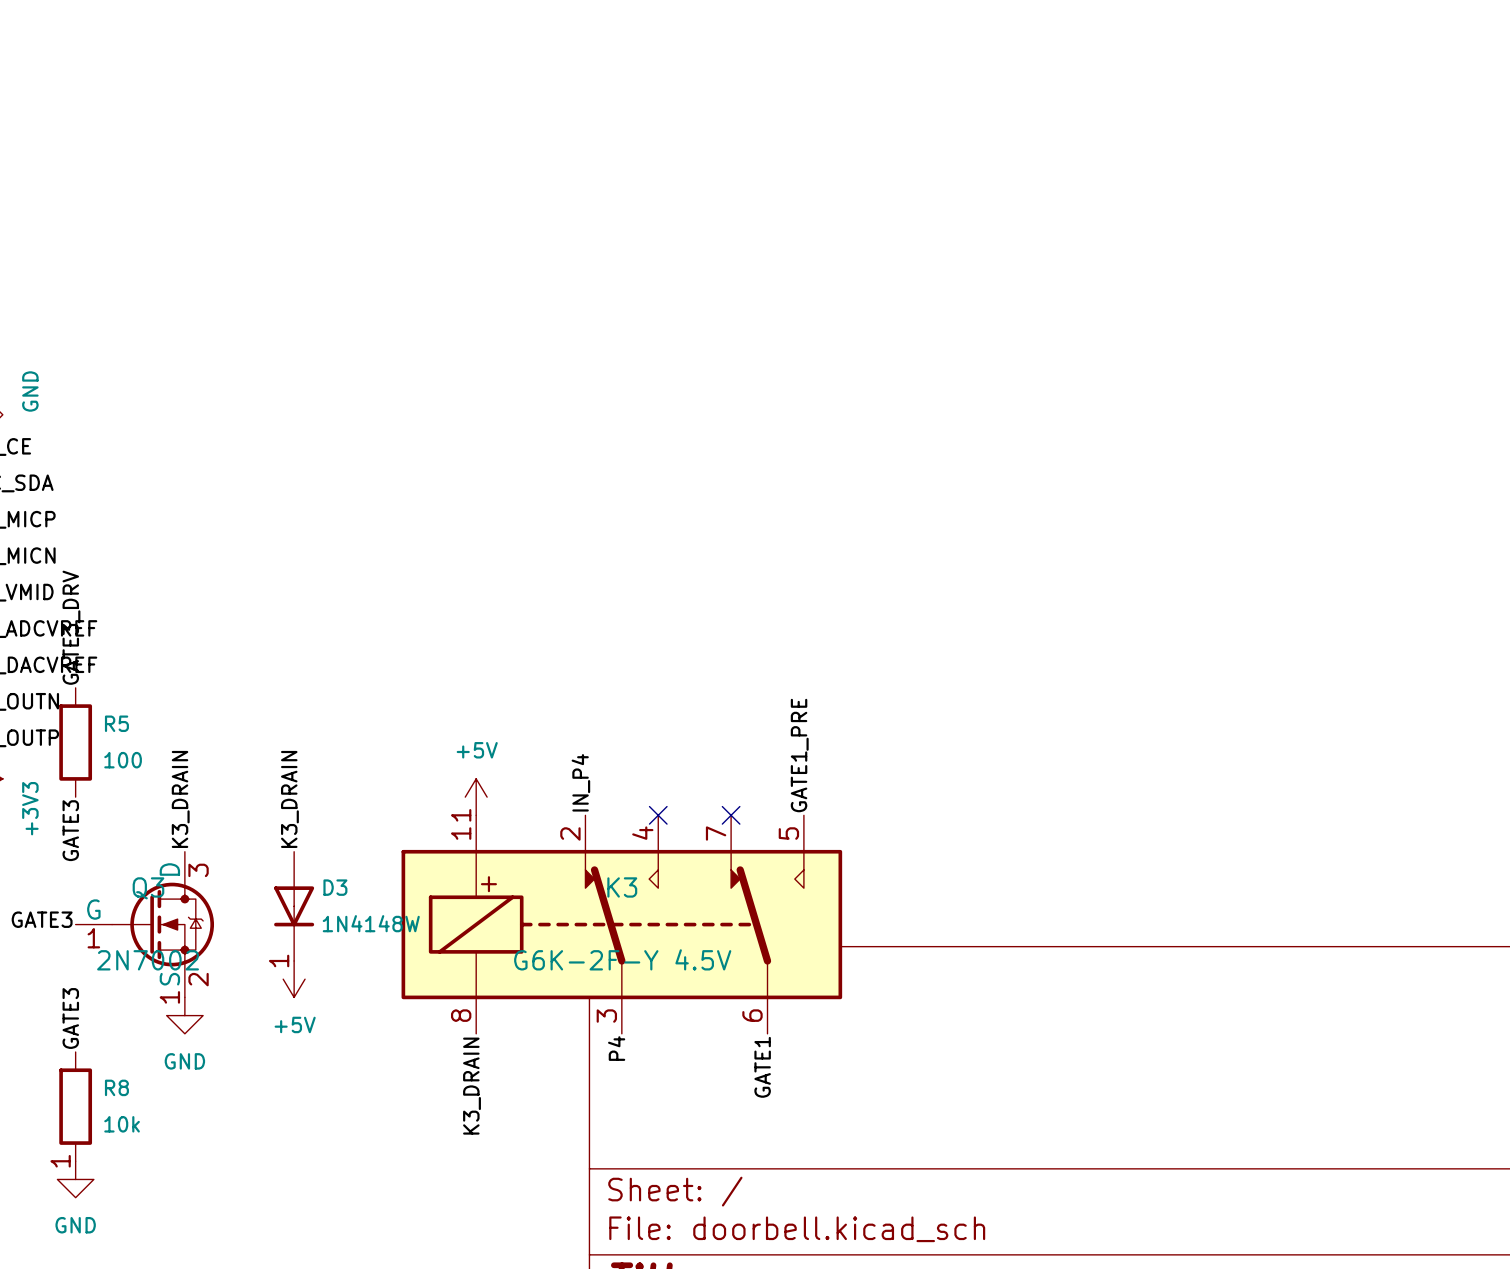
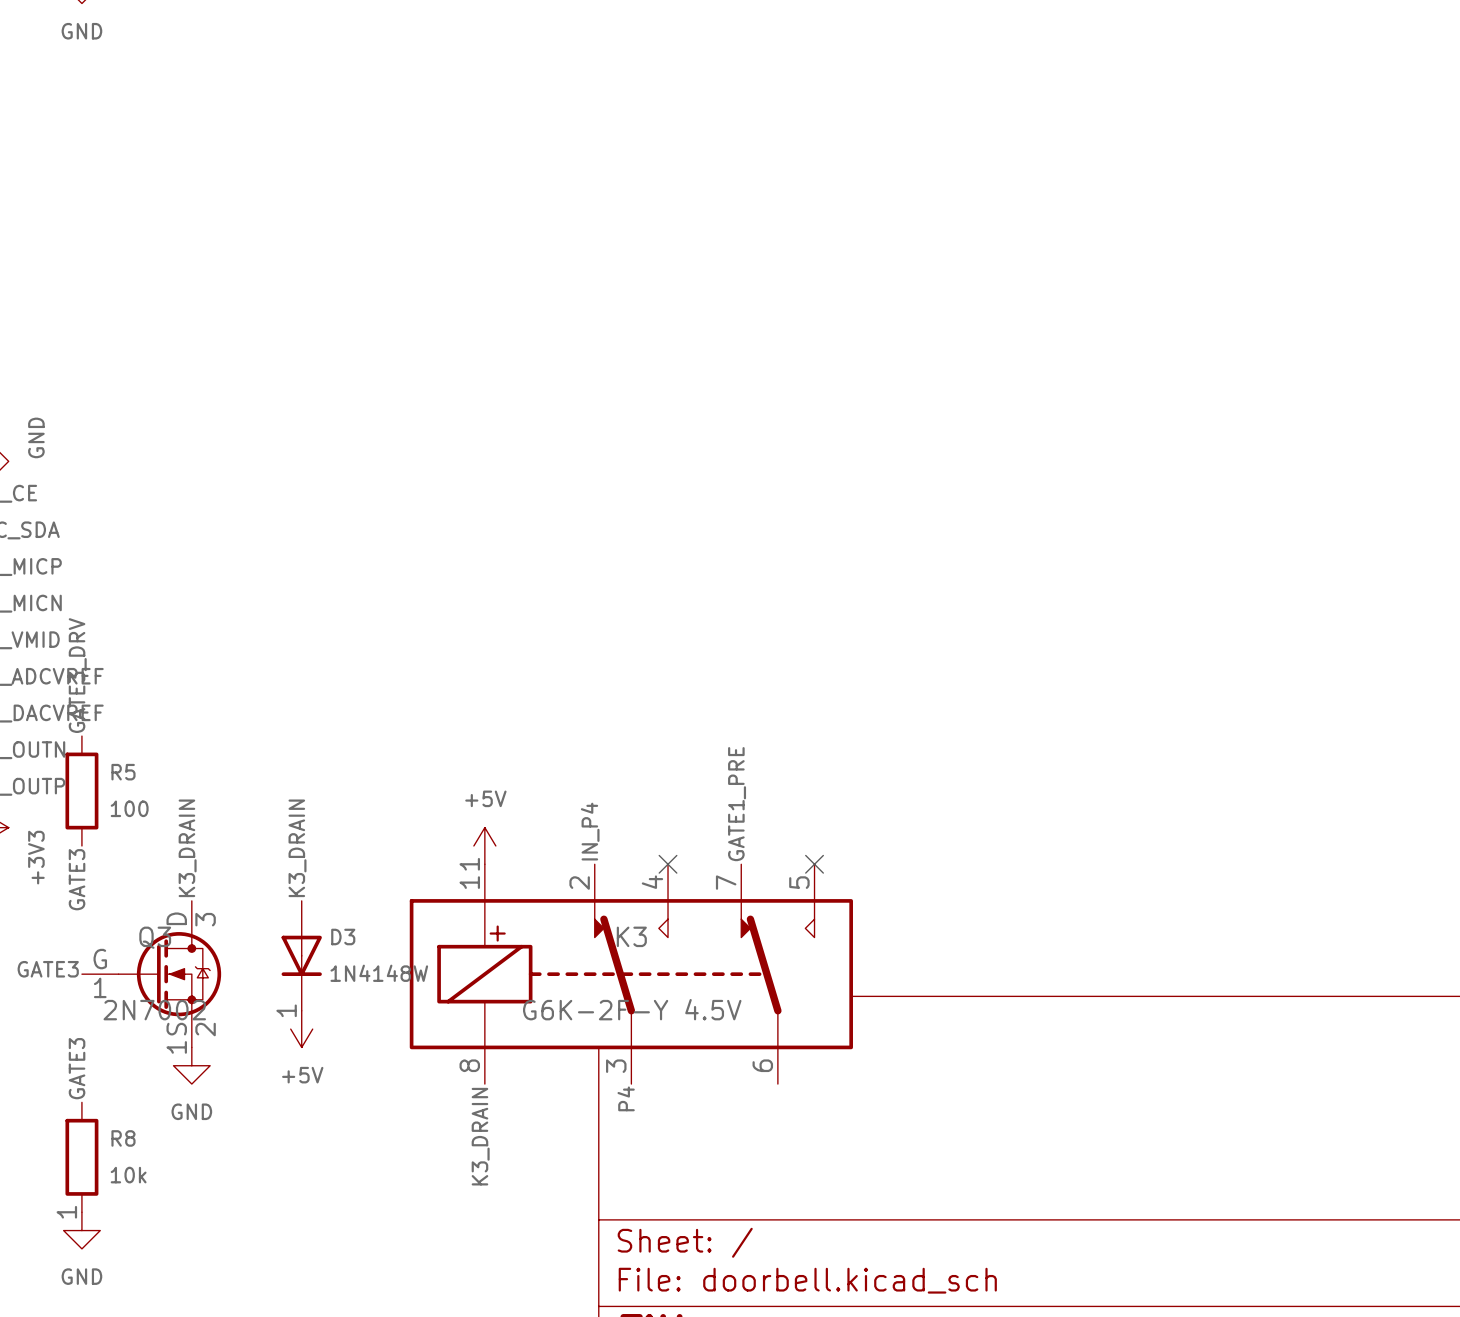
label position: GATE1_PRE (799, 755) -> GATE1_PRE (737, 804)
no-connect mark position: (731, 815) -> (814, 864)
label: GATE1 (762, 1067) -> none

